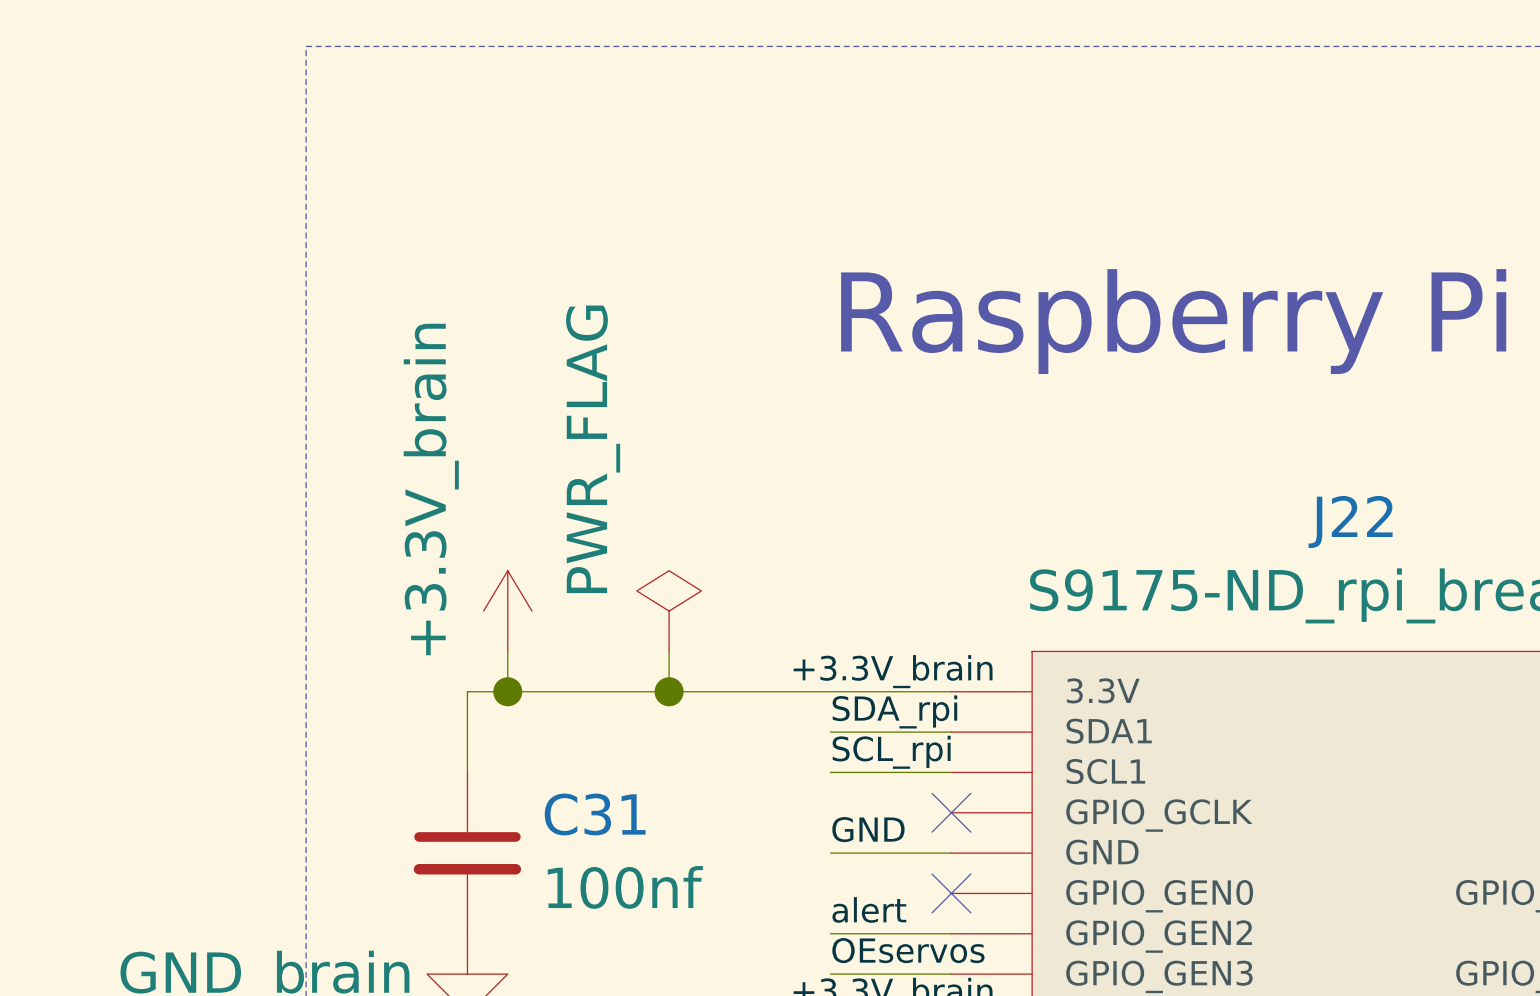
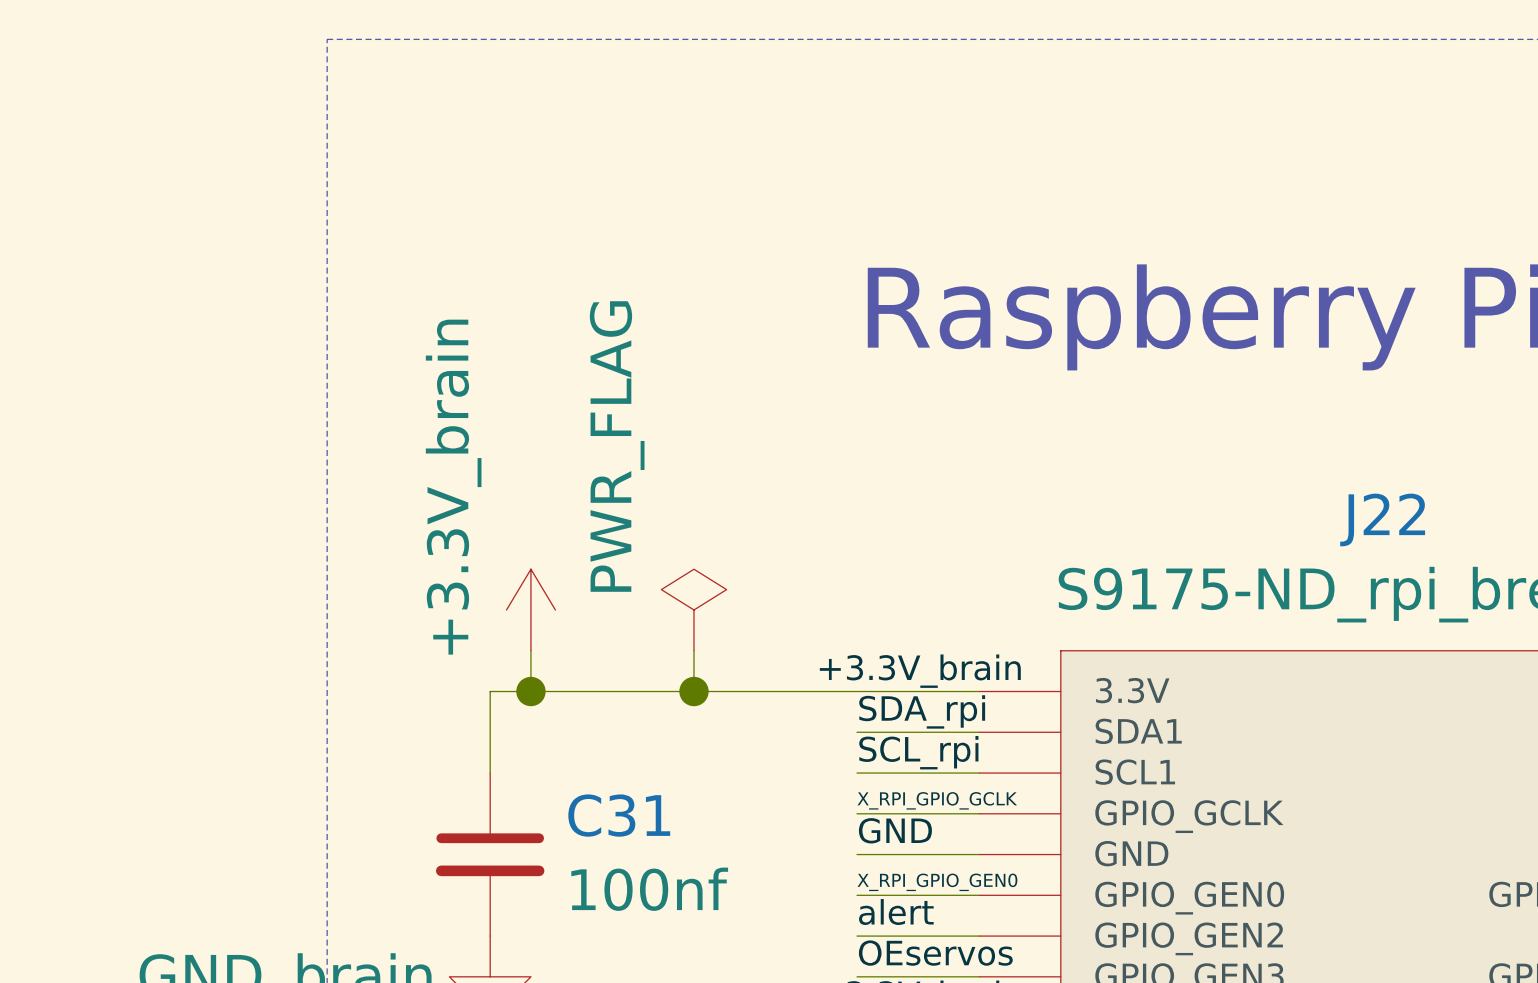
label: none -> X_RPI_GPIO_GCLK (937, 800)
wire: none -> (857, 813) (979, 813)
no-connect mark: (951, 812) -> none
label: none -> X_RPI_GPIO_GEN0 (937, 882)
wire: none -> (857, 895) (979, 895)
no-connect mark: (951, 893) -> none

